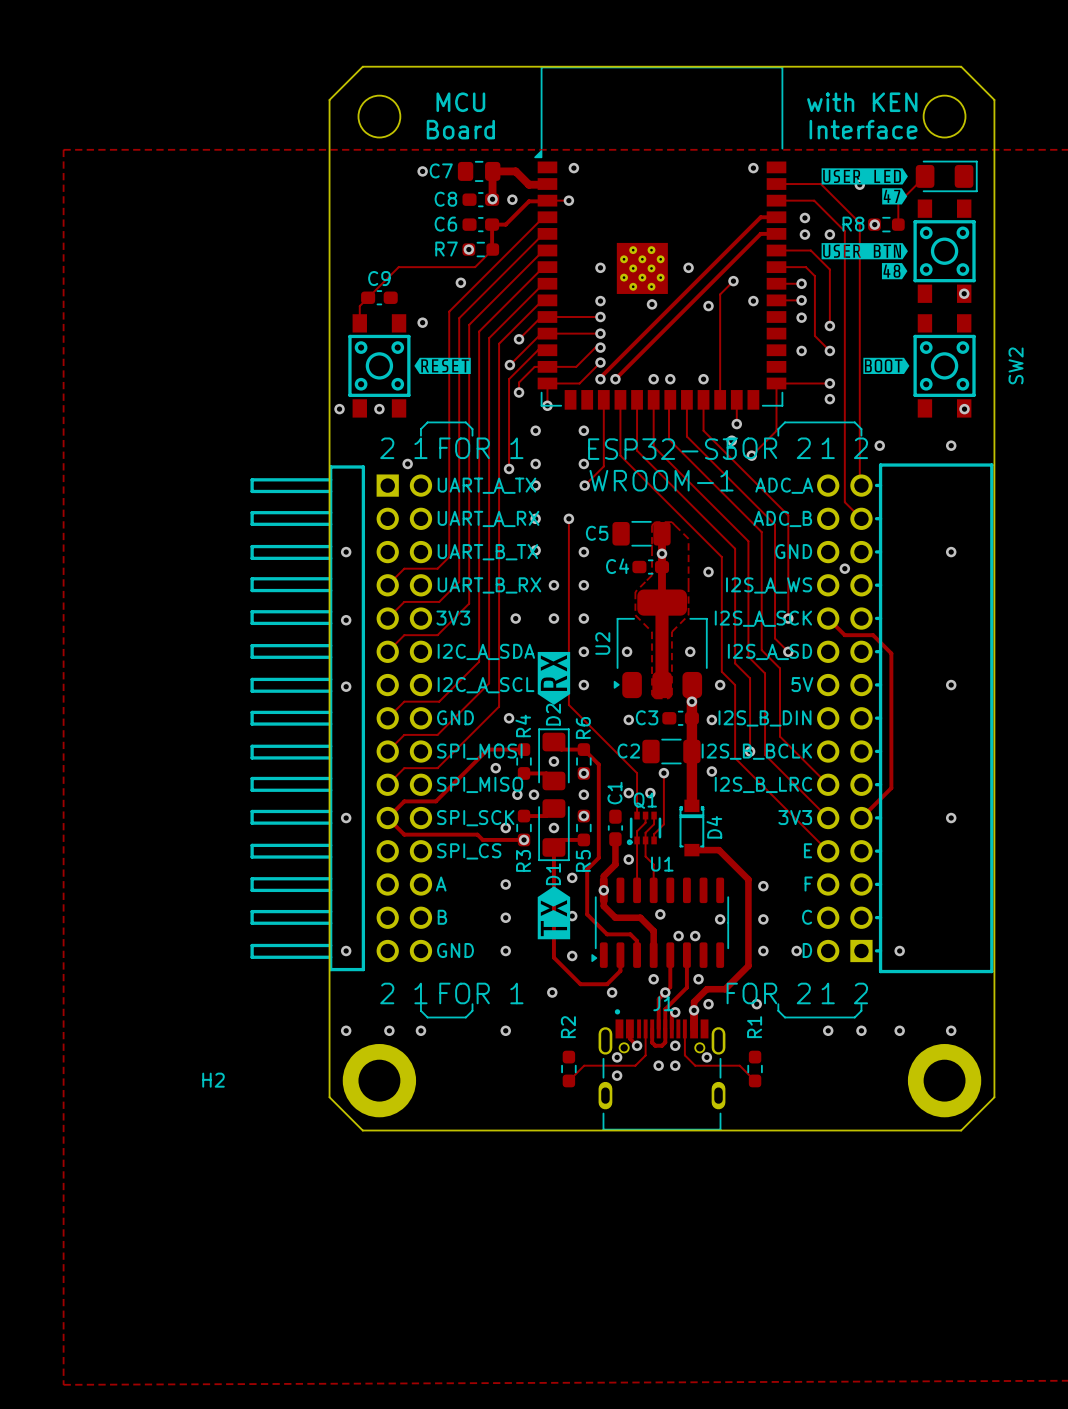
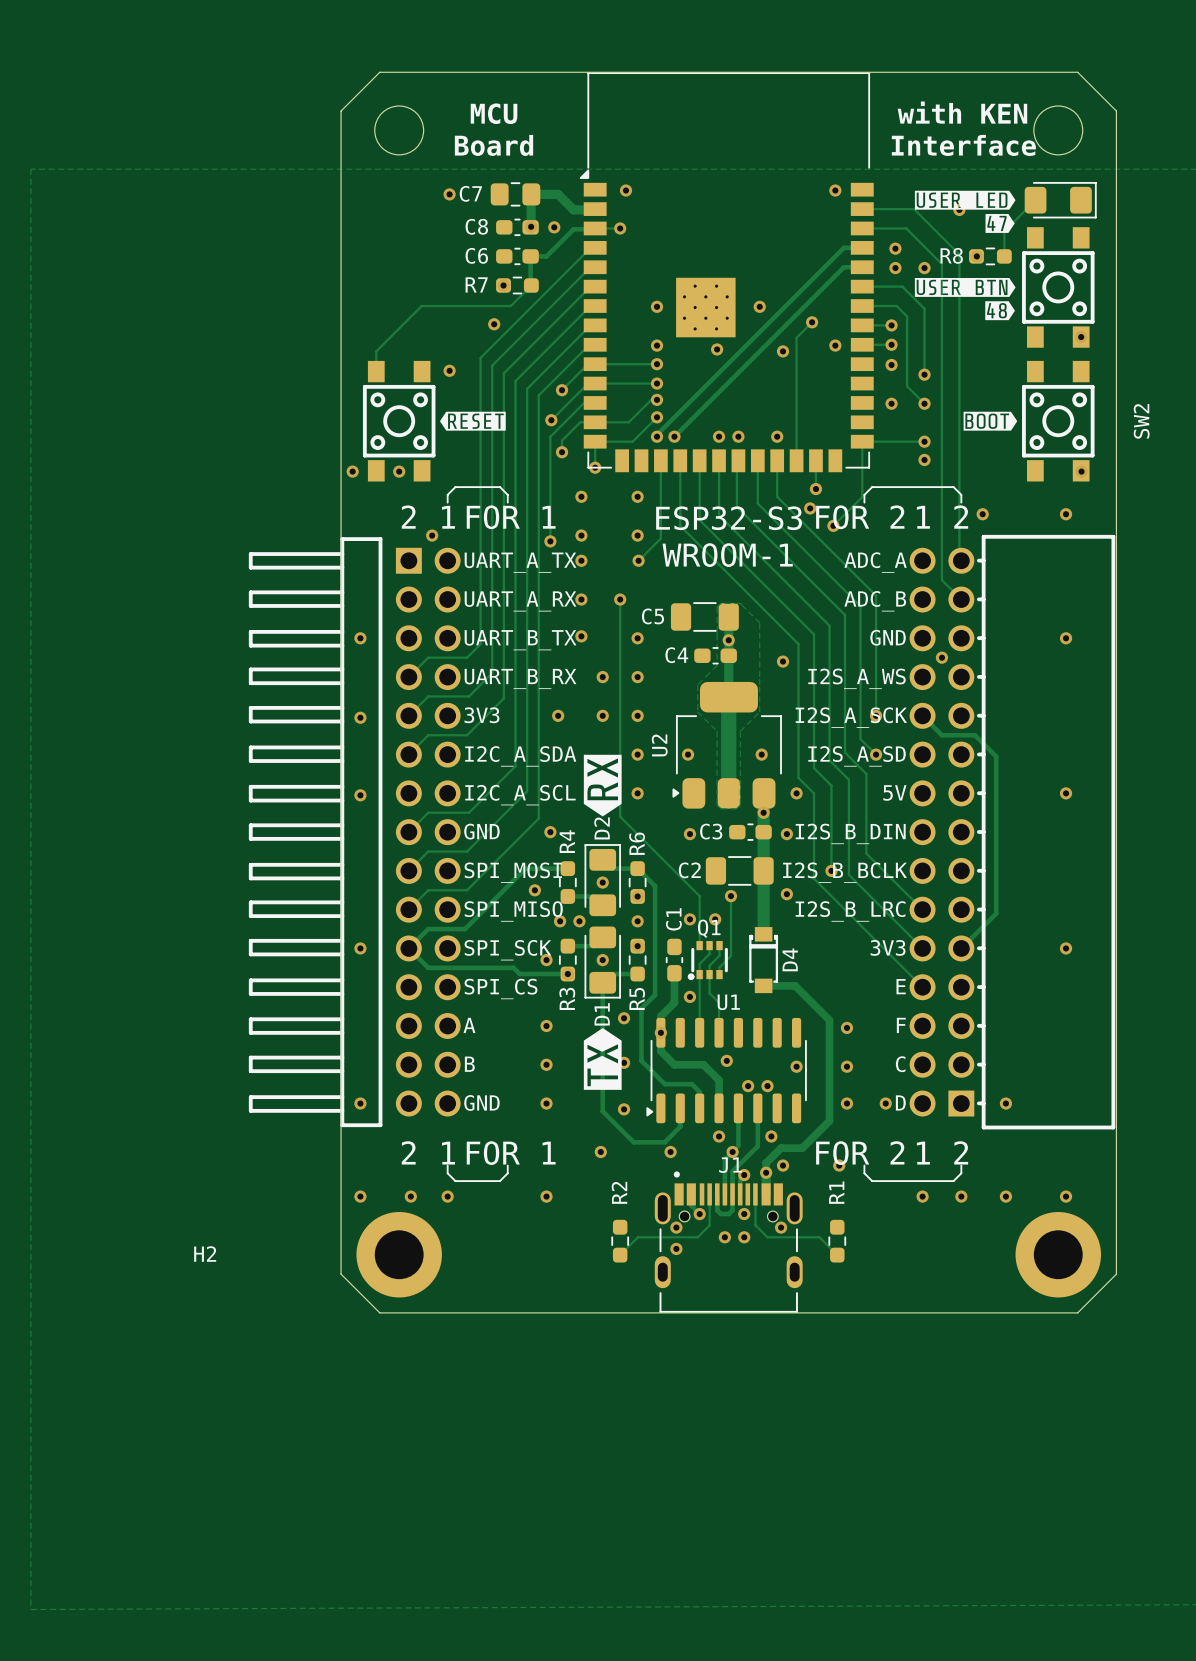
C9: (379, 297) -> none

